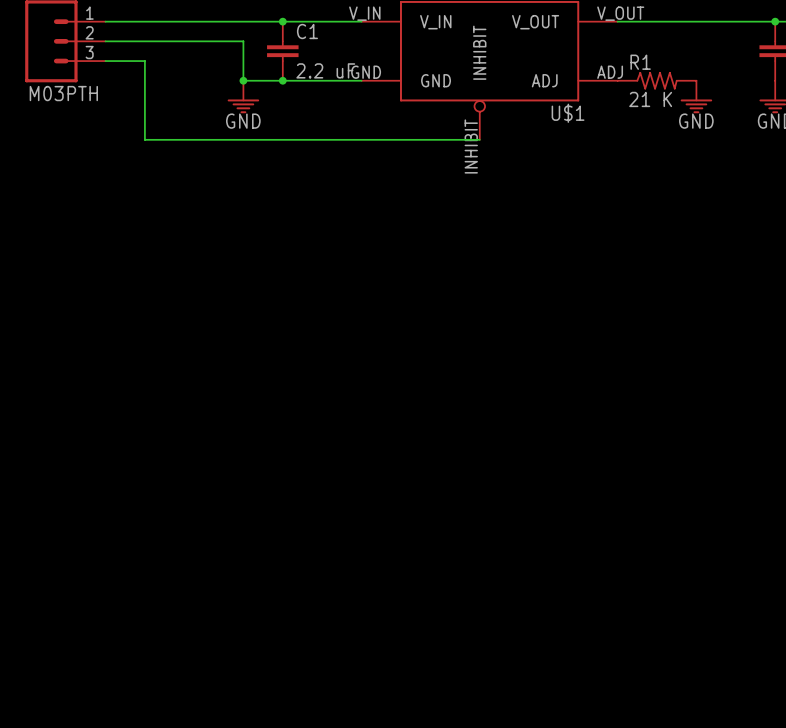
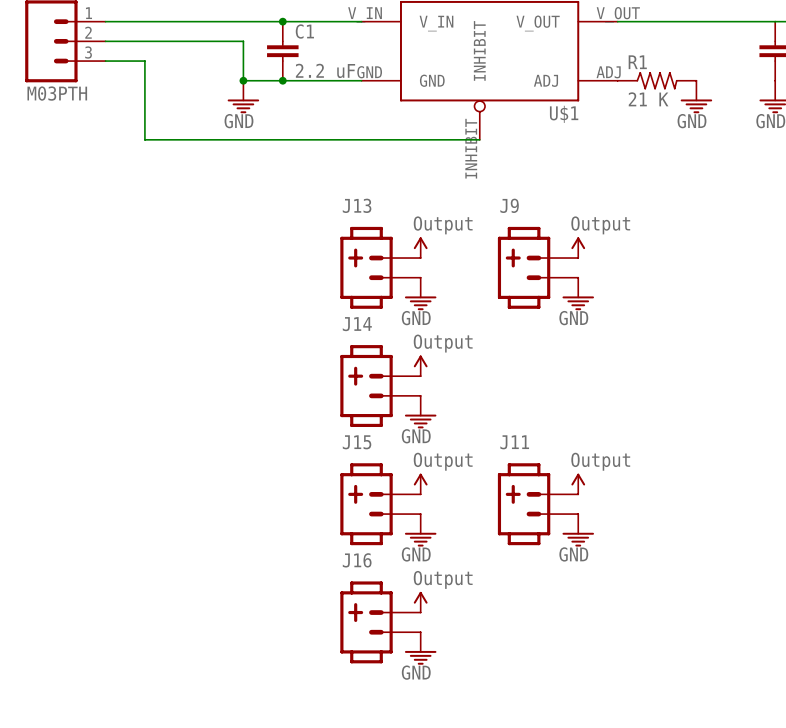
junction: (775, 21) -> none
power symbol: none -> Output (420, 247)
power symbol: none -> Output (578, 247)
J13: none -> (380, 267)
J9: none -> (538, 267)
power symbol: none -> GND (420, 293)
power symbol: none -> GND (578, 293)
power symbol: none -> Output (420, 365)
J14: none -> (380, 386)
power symbol: none -> GND (420, 412)
power symbol: none -> Output (420, 484)
power symbol: none -> Output (578, 484)
J15: none -> (380, 504)
J11: none -> (538, 504)
power symbol: none -> GND (420, 530)
power symbol: none -> GND (578, 530)
power symbol: none -> Output (420, 602)
J16: none -> (380, 622)
power symbol: none -> GND (420, 648)

